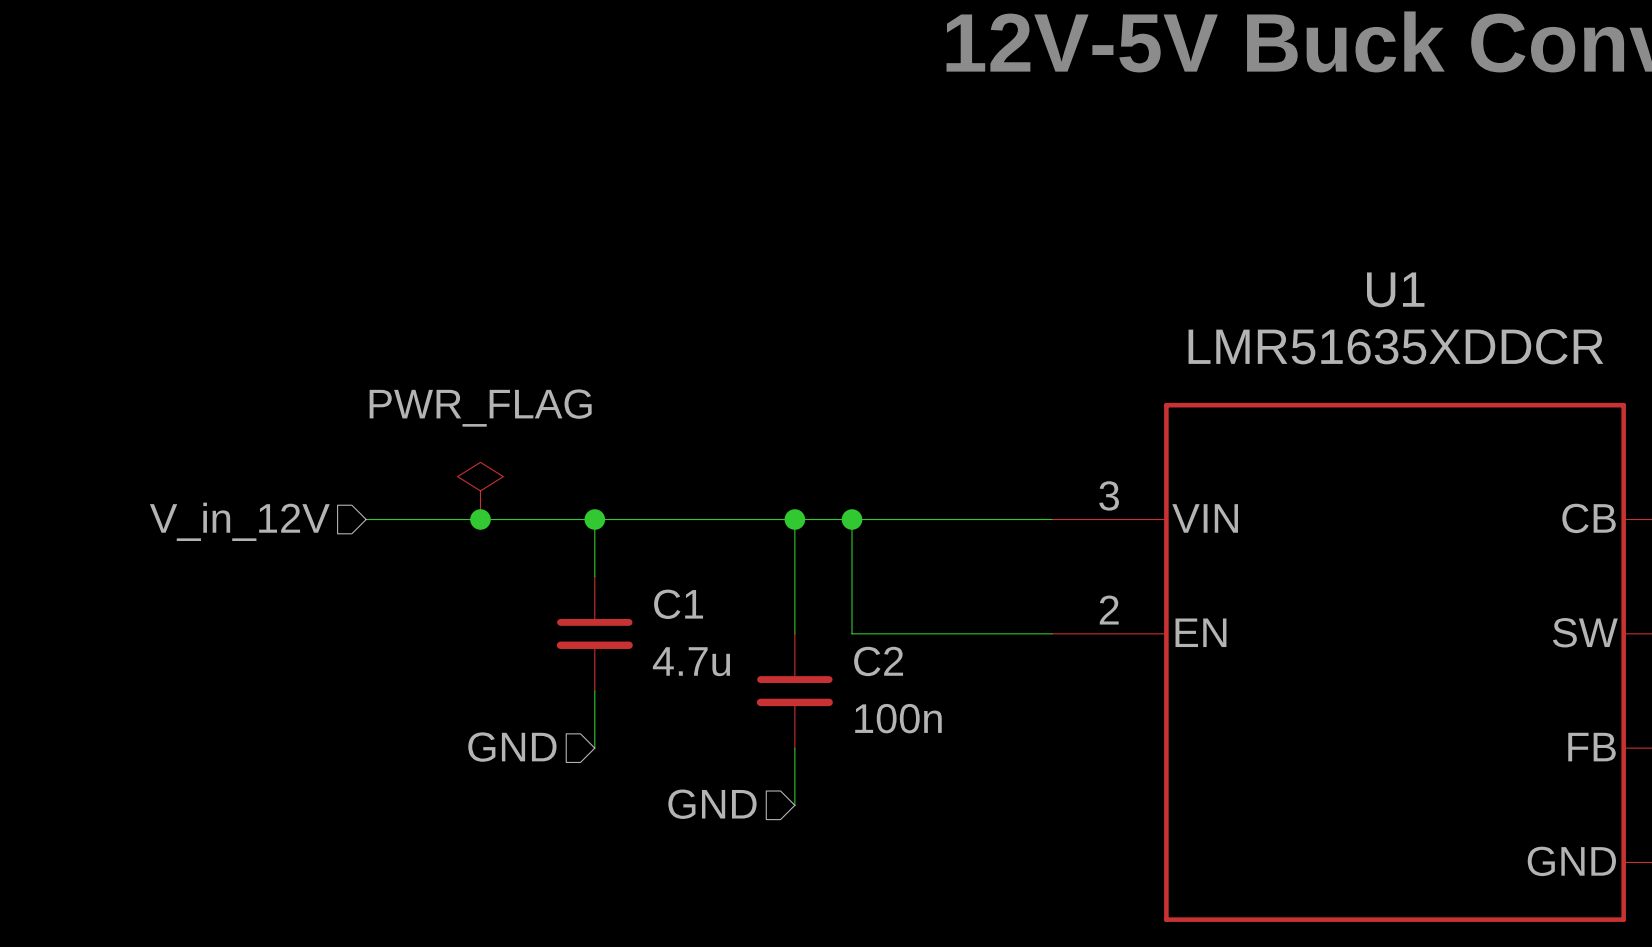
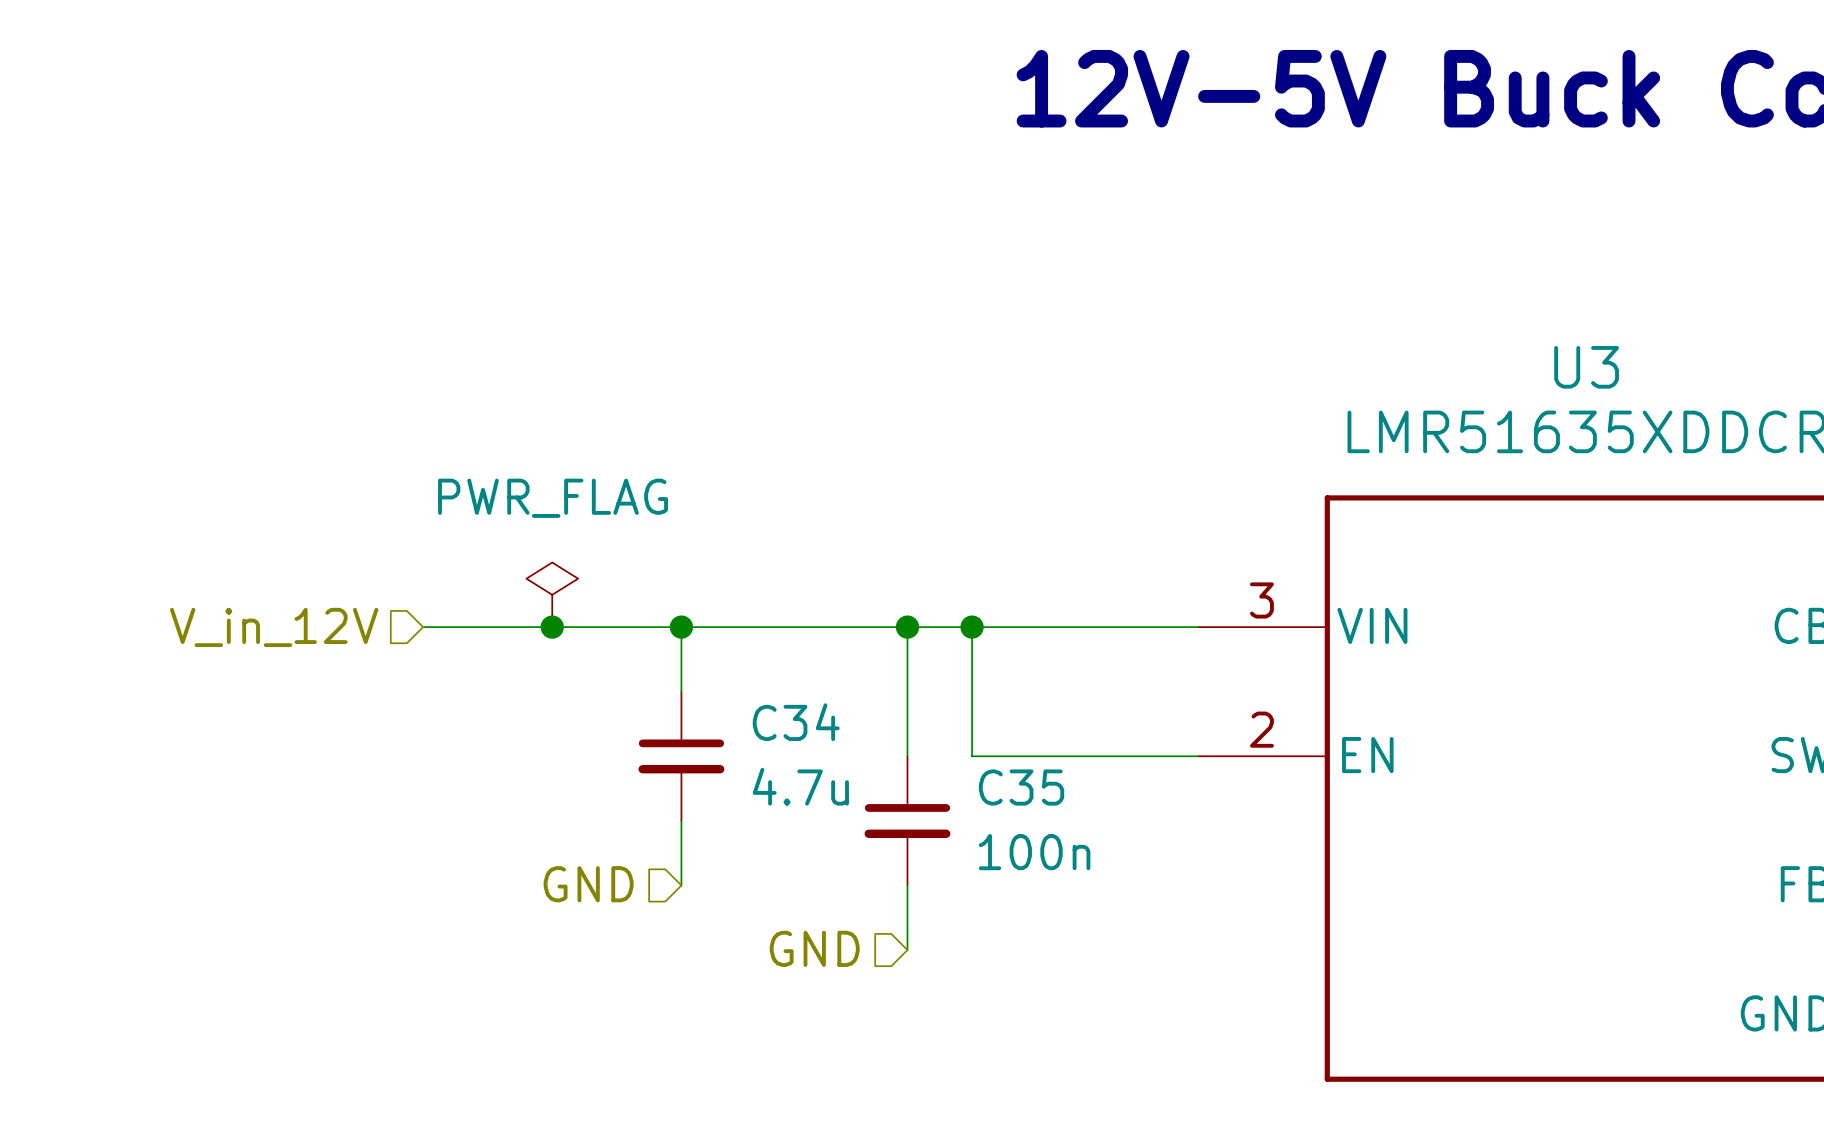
U1 name: U1 (1395, 289) -> U3 (1586, 367)
C1 name: C1 (678, 604) -> C34 (796, 722)
C2 name: C2 (878, 661) -> C35 (1021, 787)

